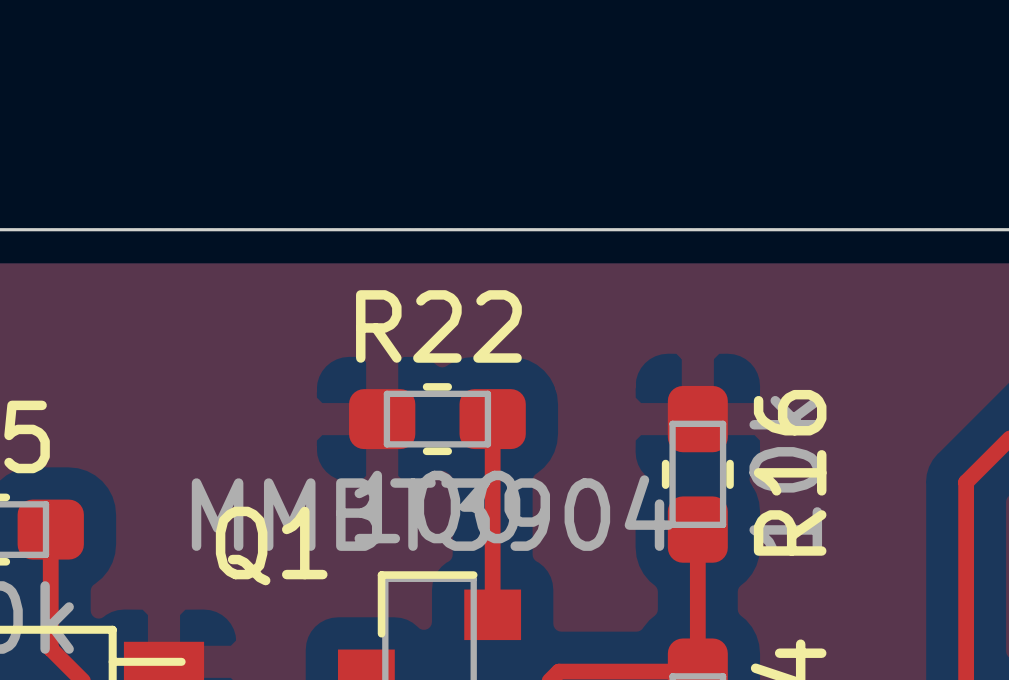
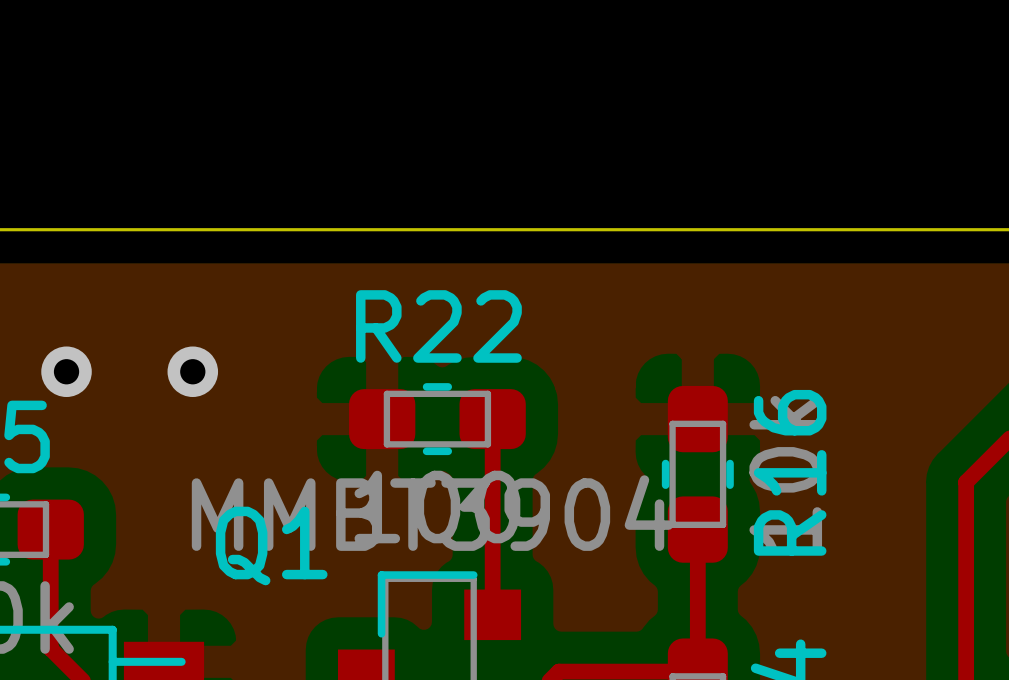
via: none -> (66, 371)
via: none -> (192, 371)

